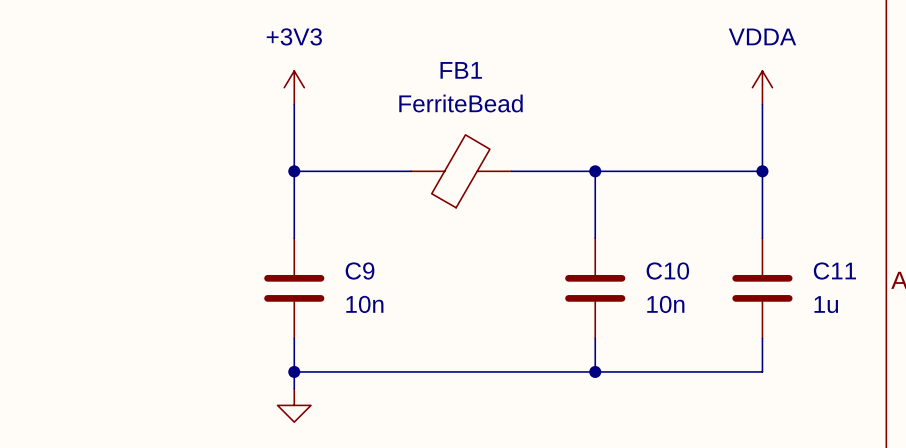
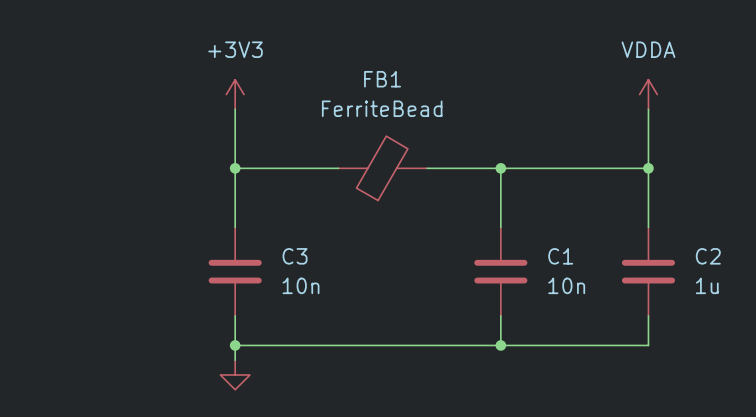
C9 name: C9 (360, 271) -> C3 (295, 256)
C10 name: C10 (667, 271) -> C1 (560, 256)
C11 name: C11 (834, 271) -> C2 (708, 256)

